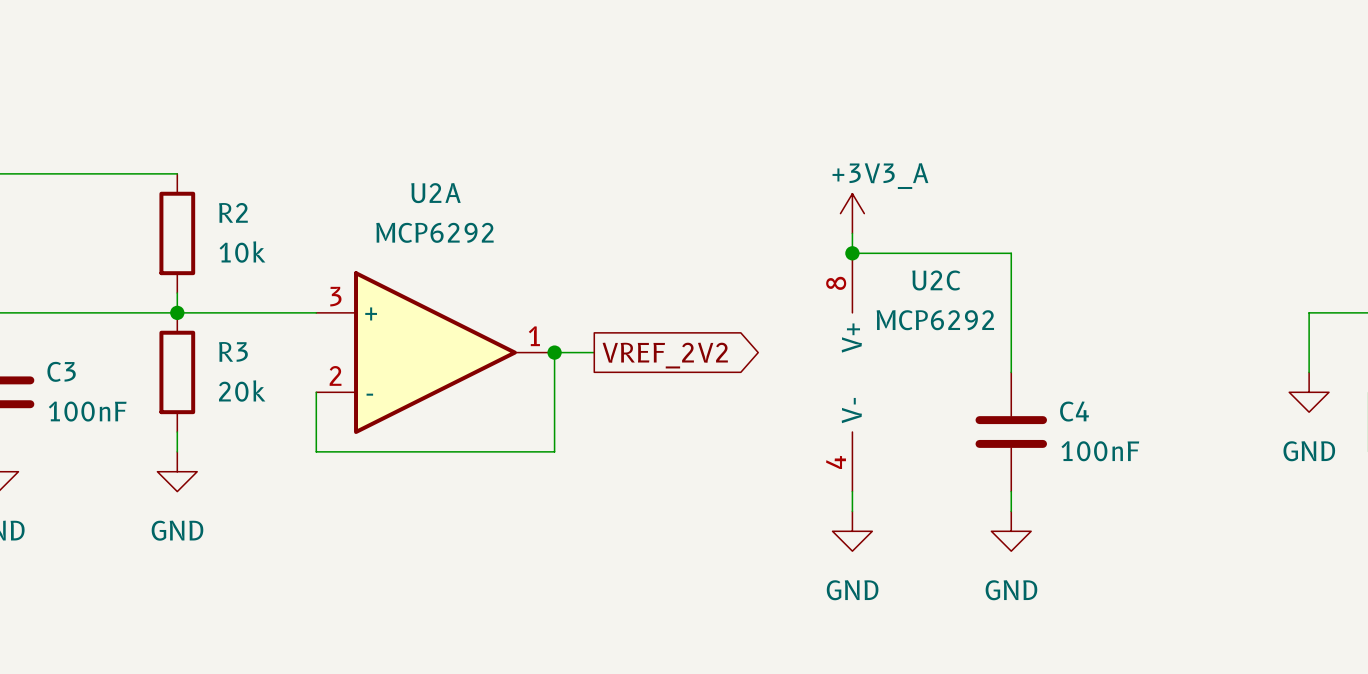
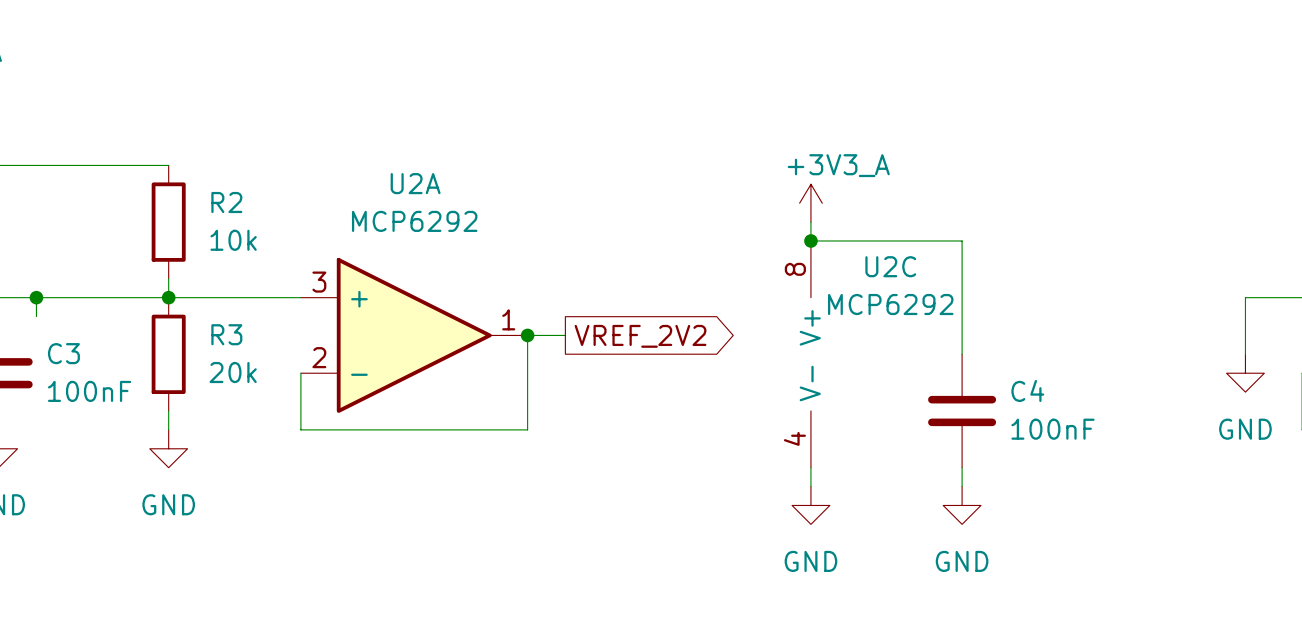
wire: none -> (36, 297) (36, 316)
junction: none -> (36, 297)

